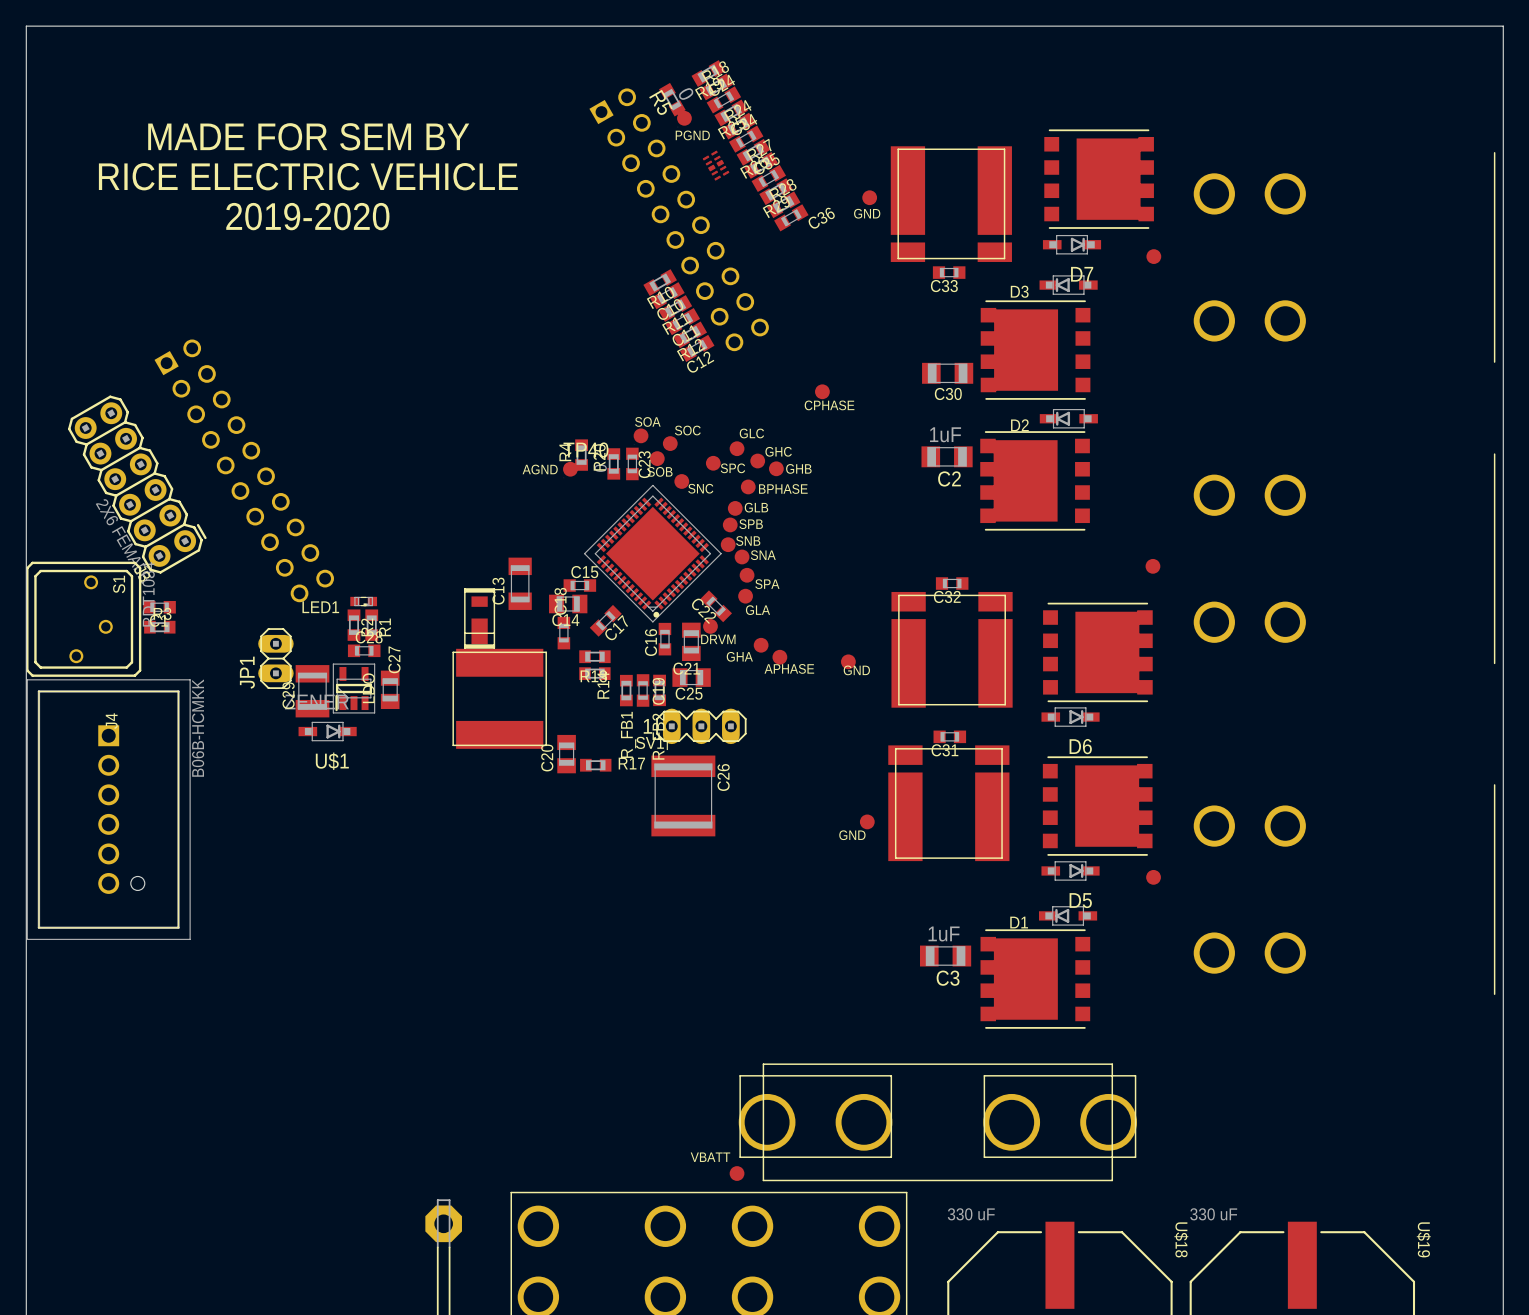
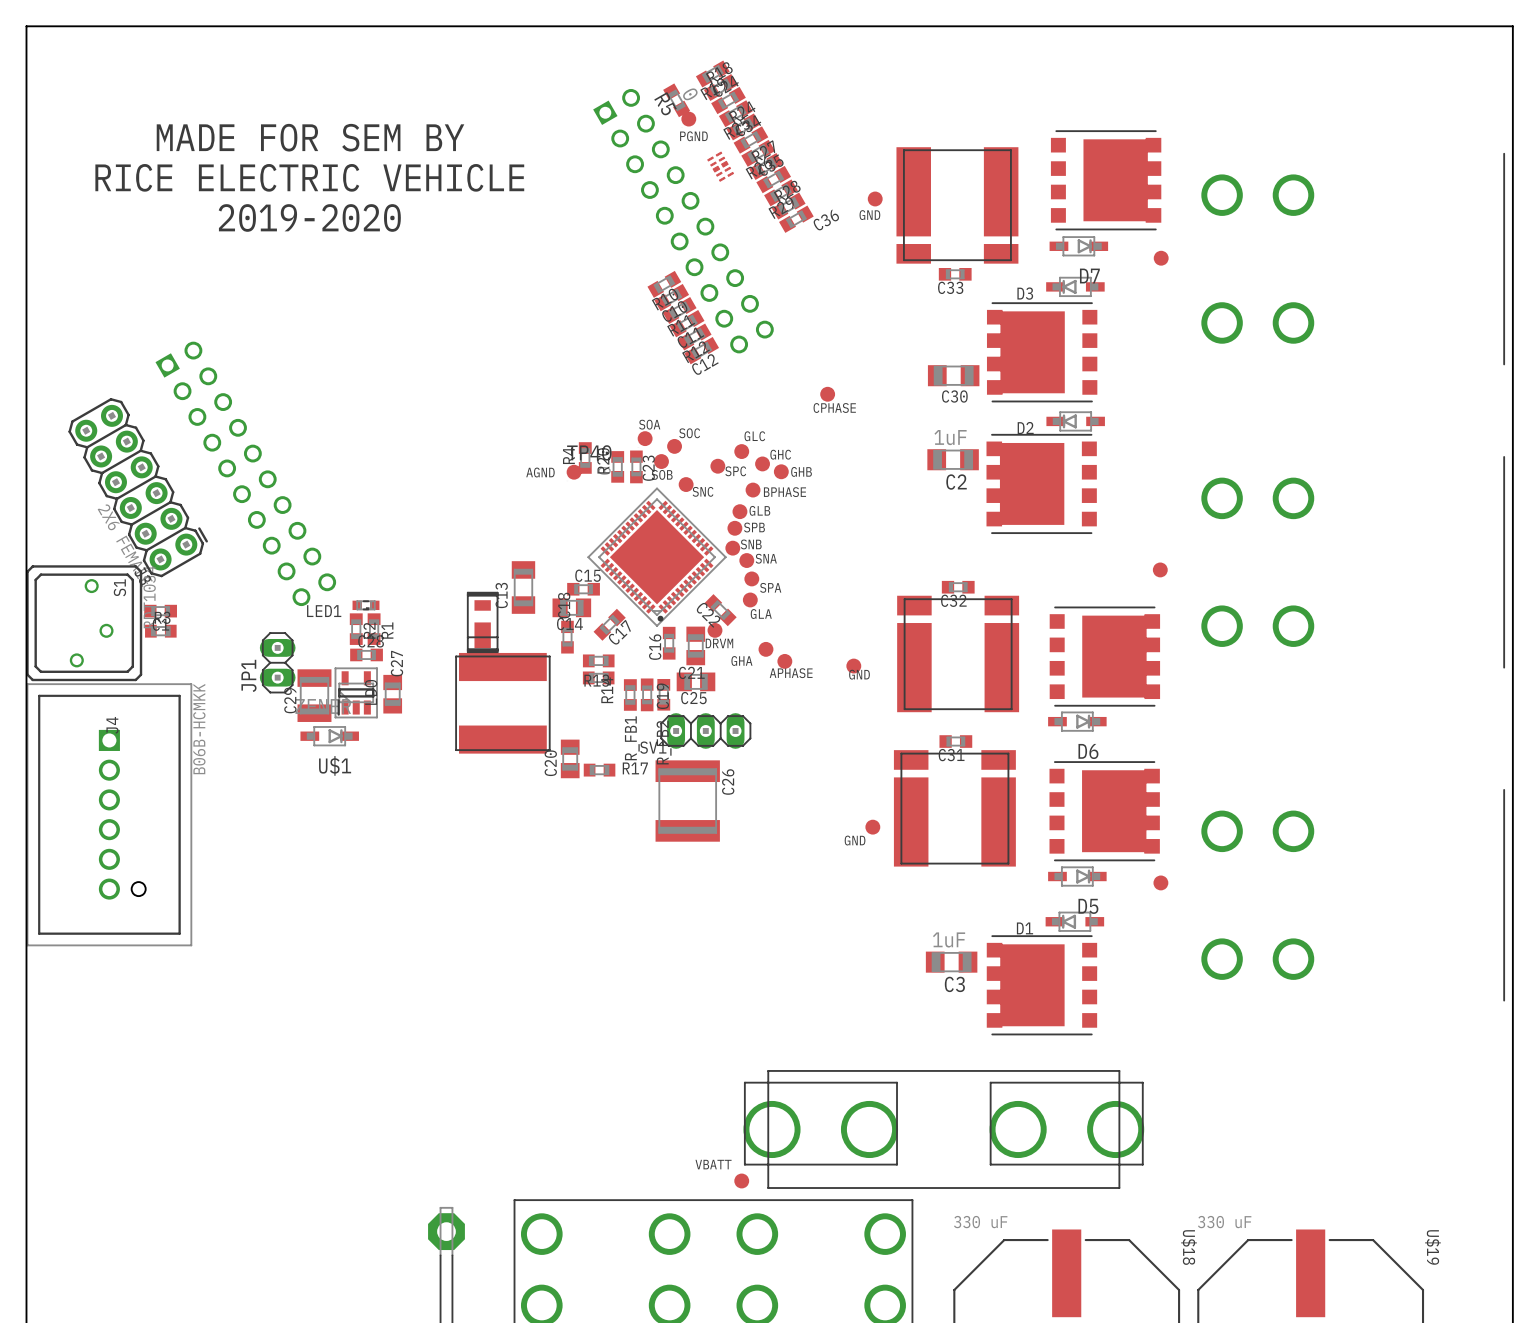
SV1 footprint: [656, 708, 747, 745] -> [660, 713, 752, 749]

